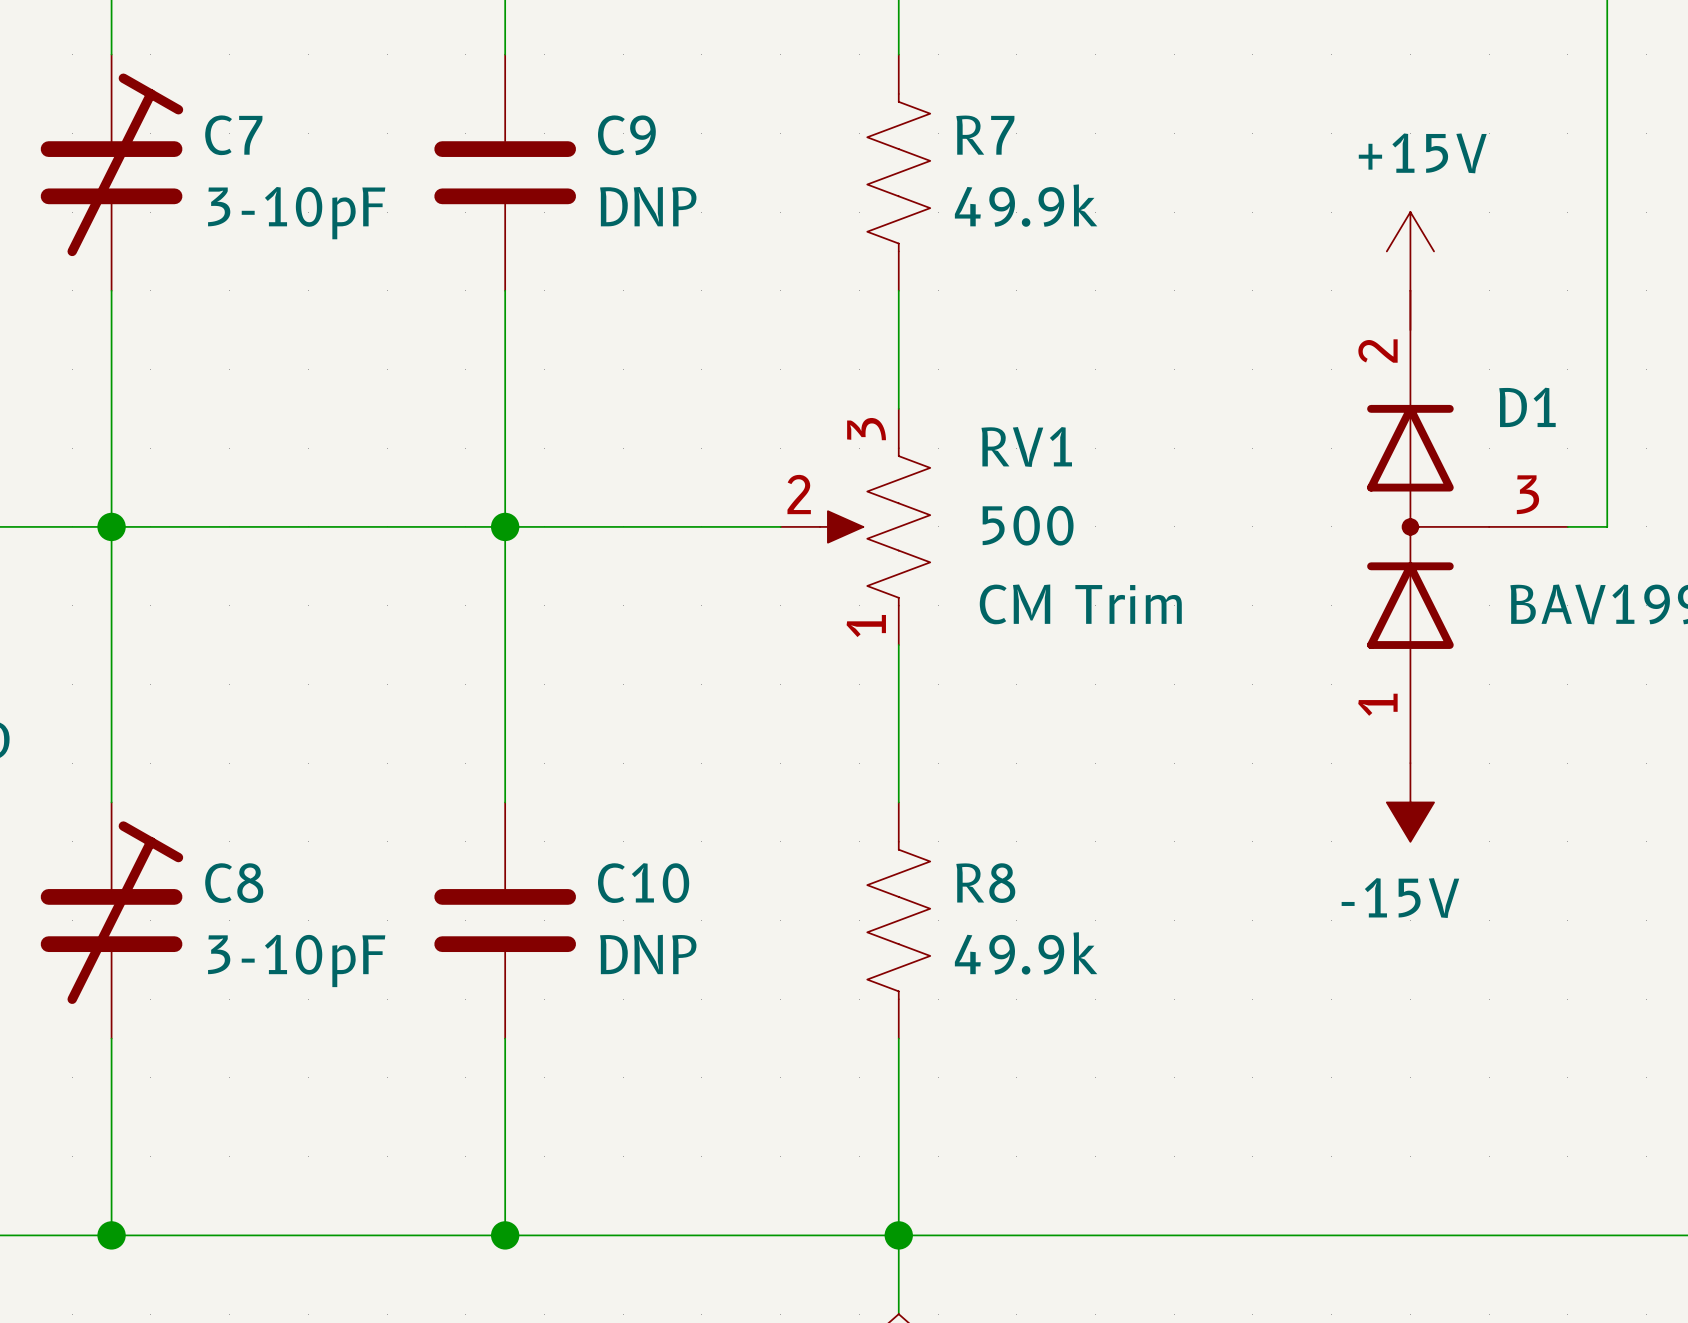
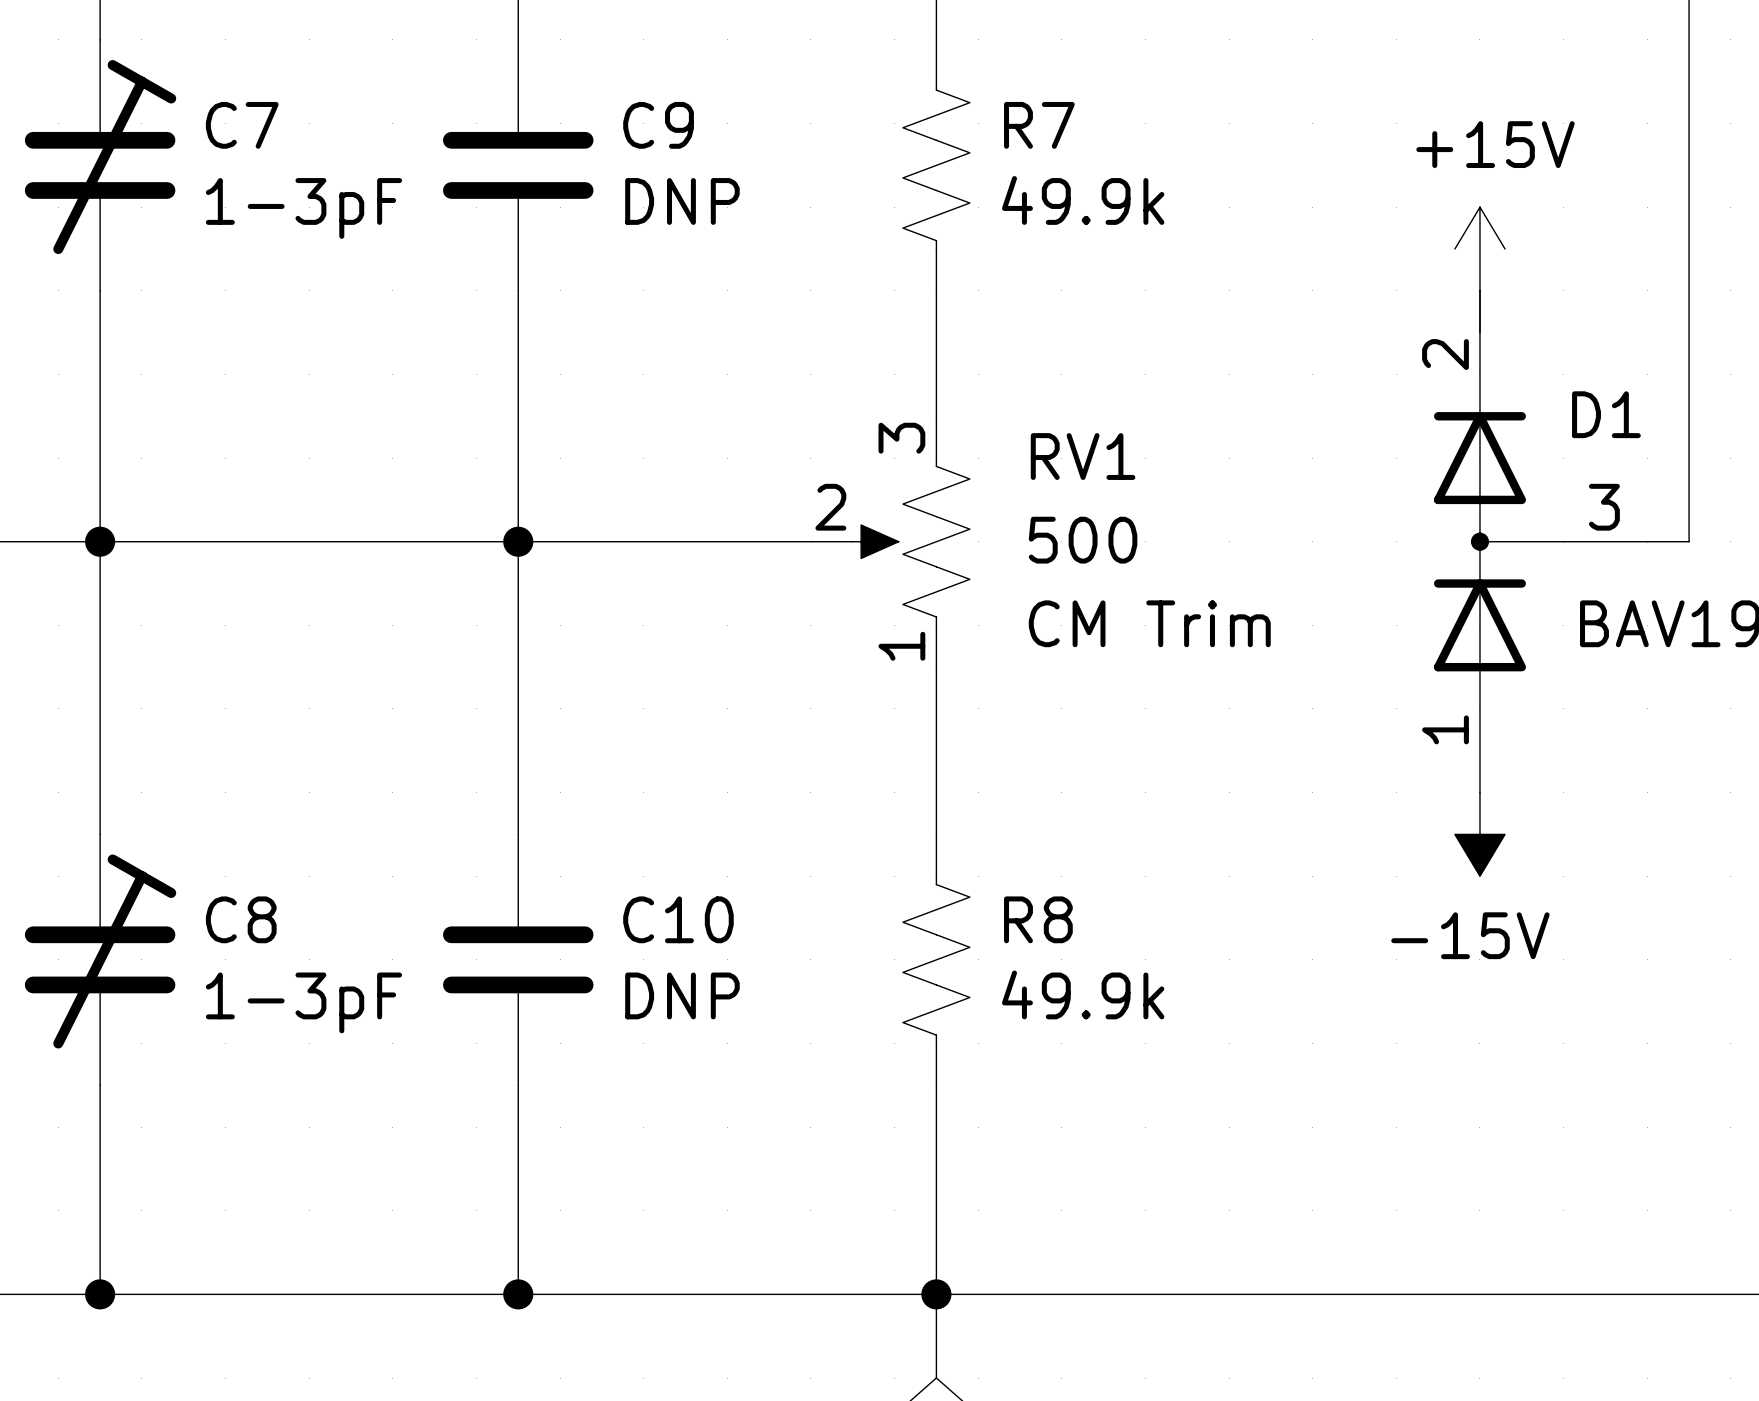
C7 value: 3-10pF (296, 213) -> 1-3pF (303, 208)
C8 value: 3-10pF (296, 960) -> 1-3pF (303, 1002)

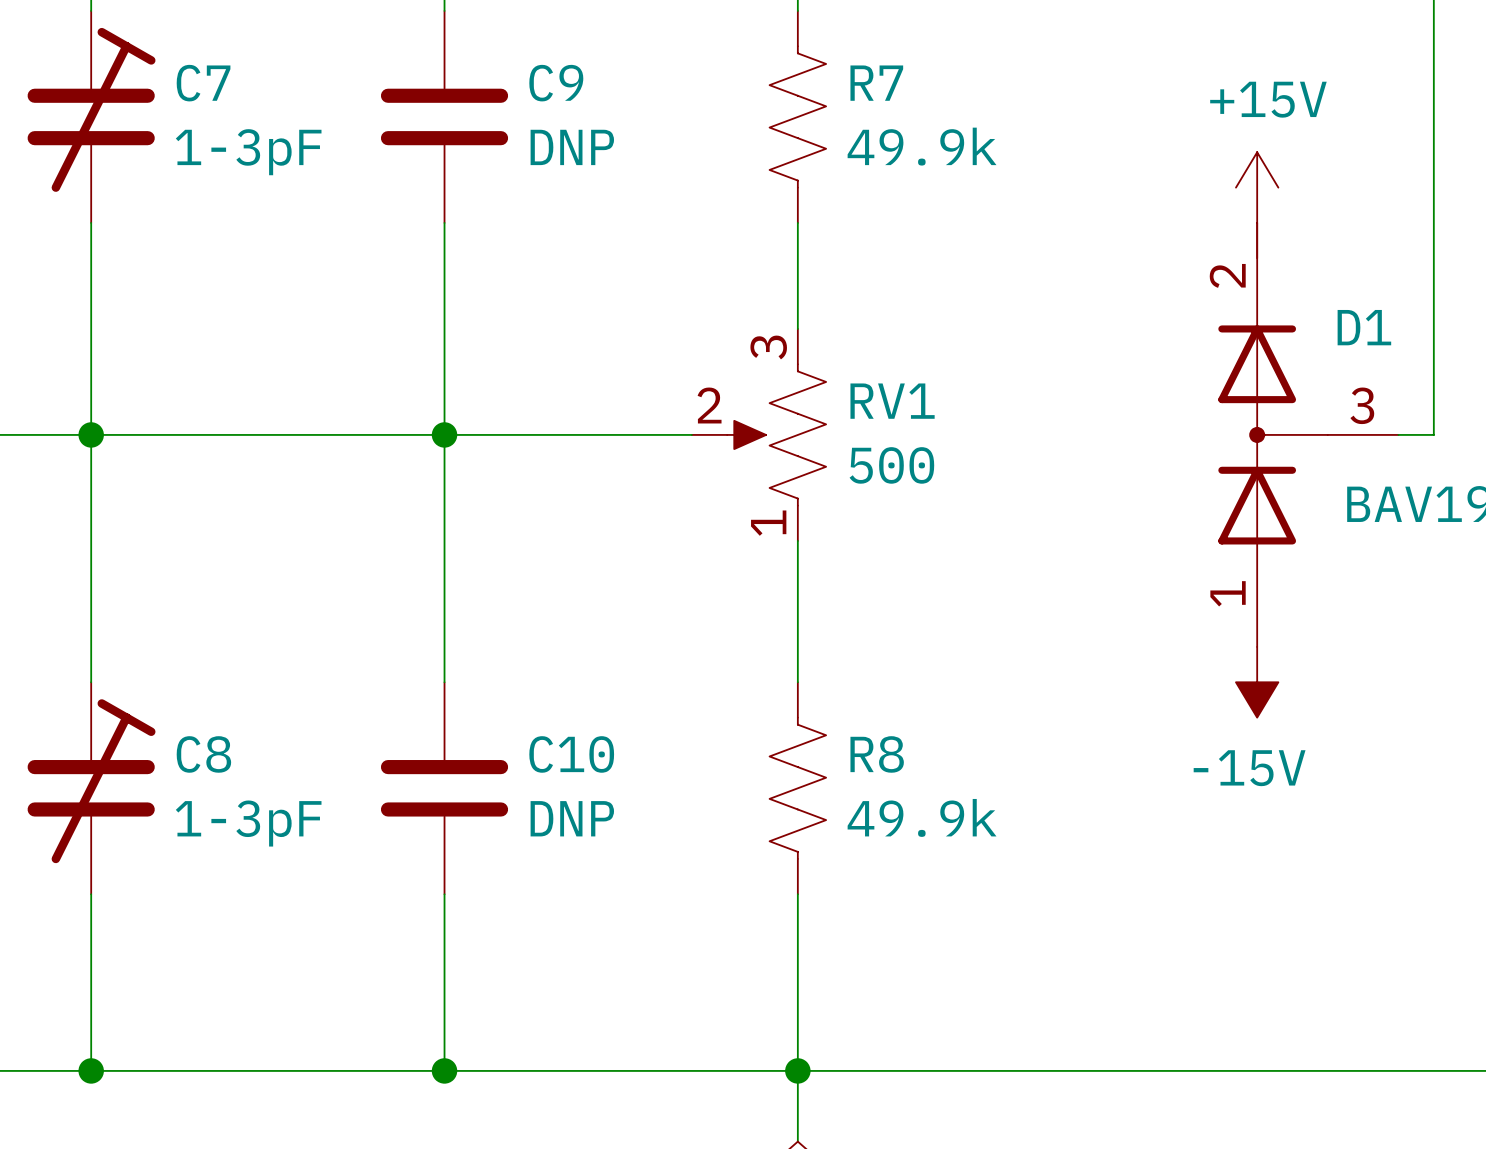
RV1 name position: RV1 (1083, 456) -> RV1 (892, 401)
RV1 value position: 500 (1083, 540) -> 500 (891, 465)
RV1 text: CM Trim (1149, 623) -> none

